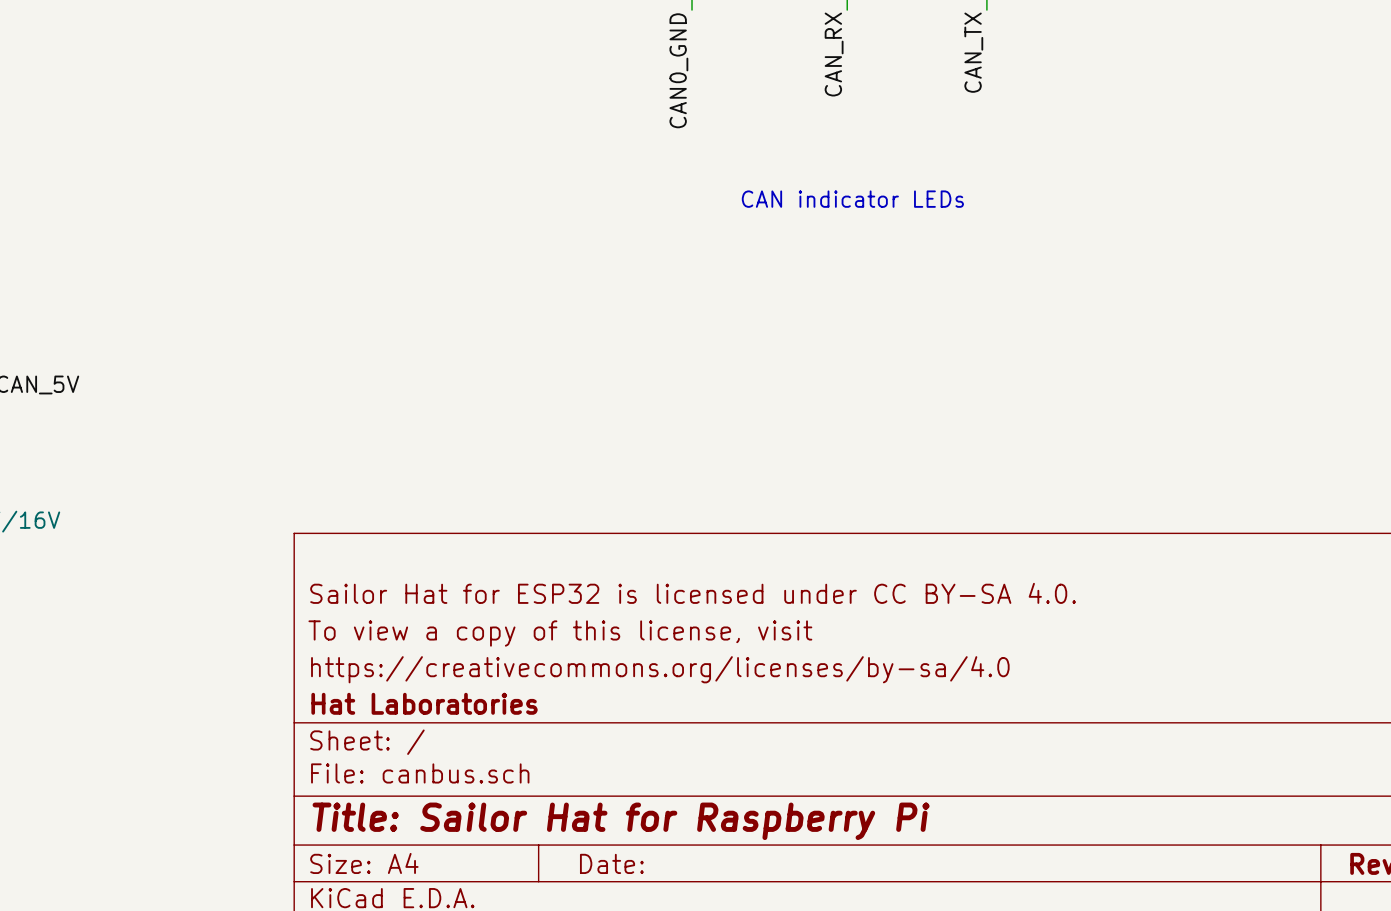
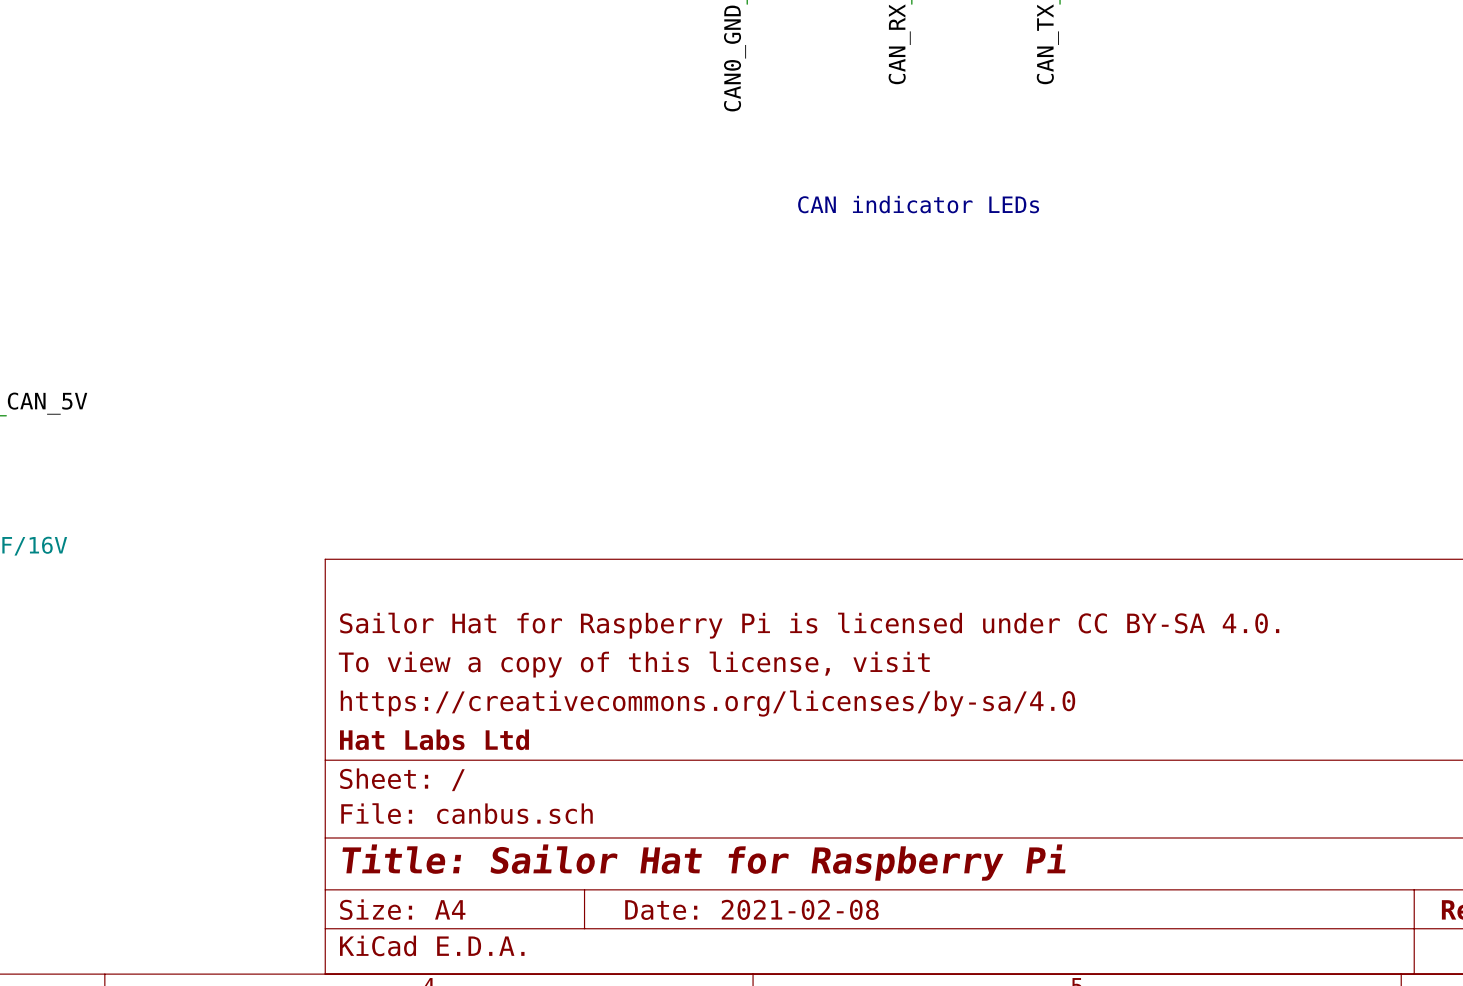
title block: Sailor Hat for ESP32 is licensed under CC BY-SA 4.0. (693, 593) -> Sailor Hat for Raspberry Pi is licensed under CC BY-SA 4.0. (809, 625)
title block: Hat Laboratories (424, 703) -> Hat Labs Ltd (434, 739)
title block: Date: (611, 863) -> Date: 2021-02-08 (751, 909)

